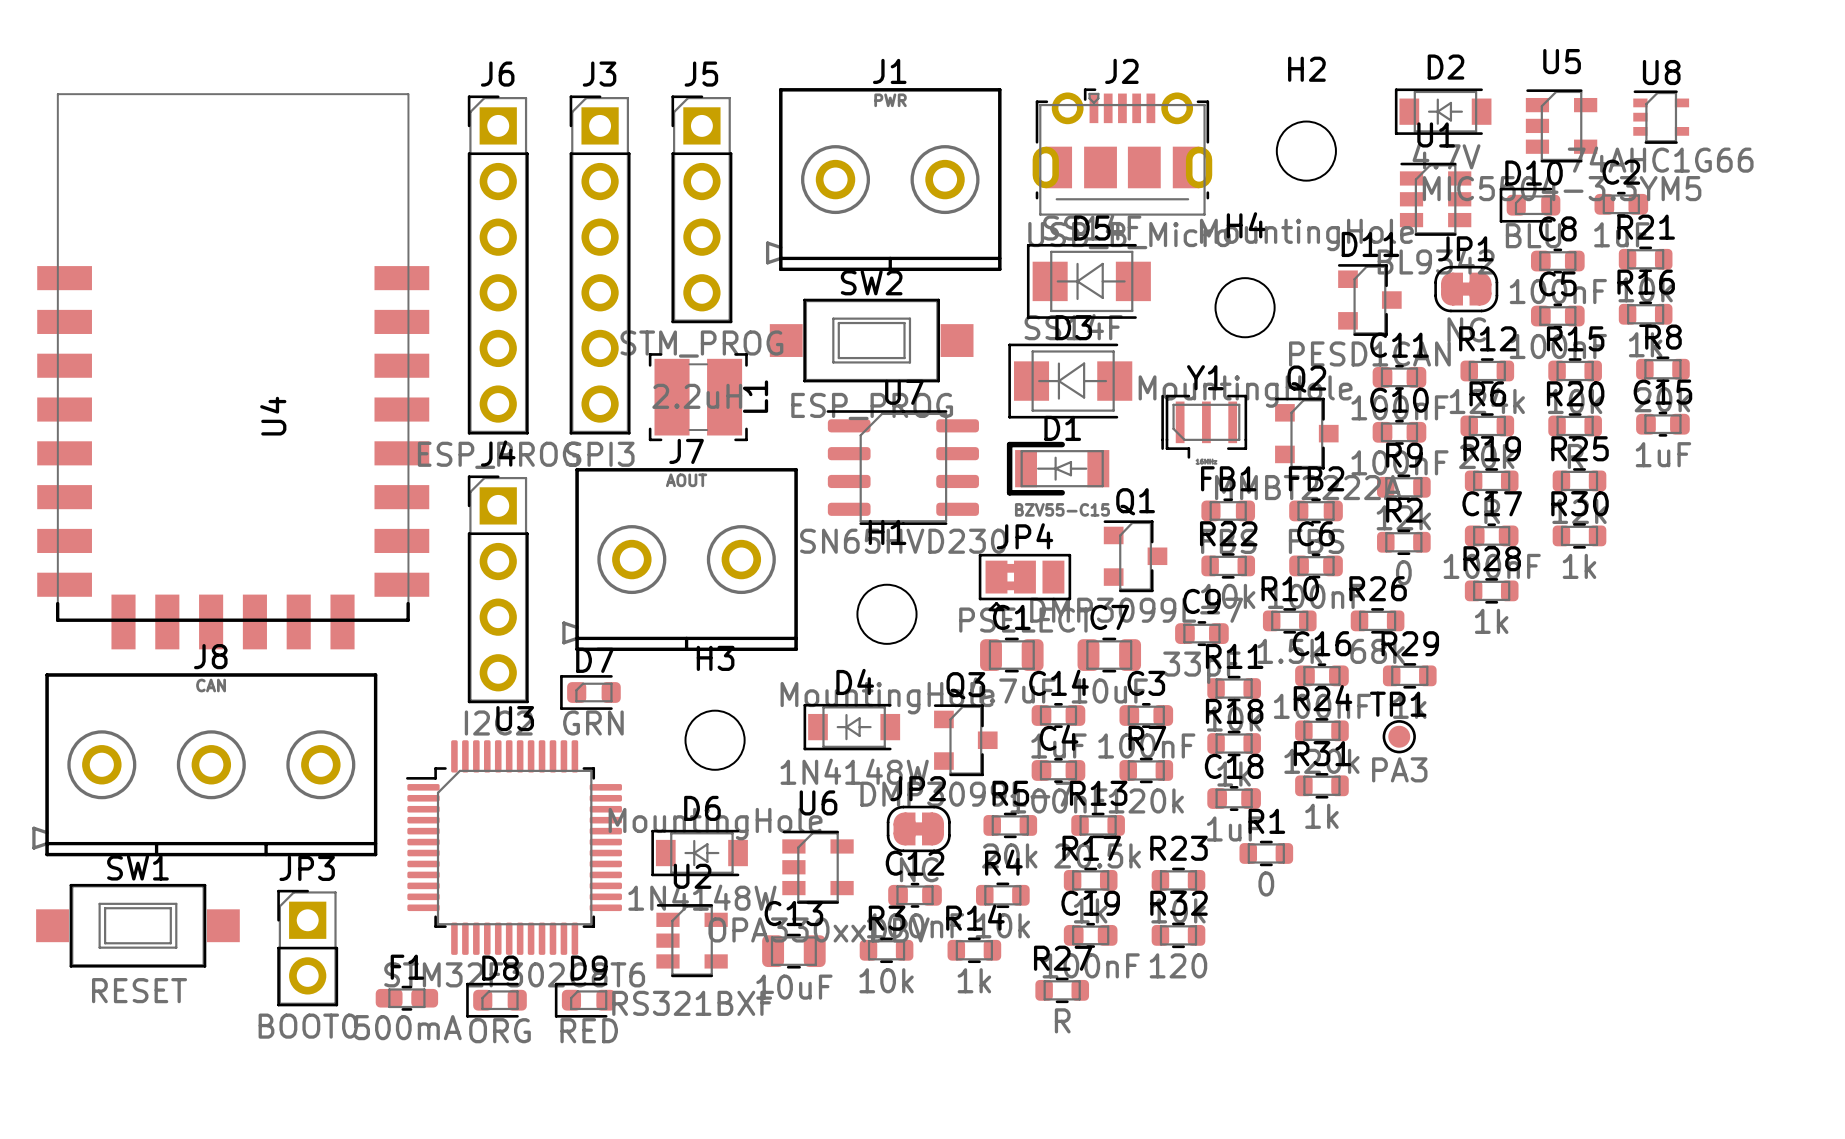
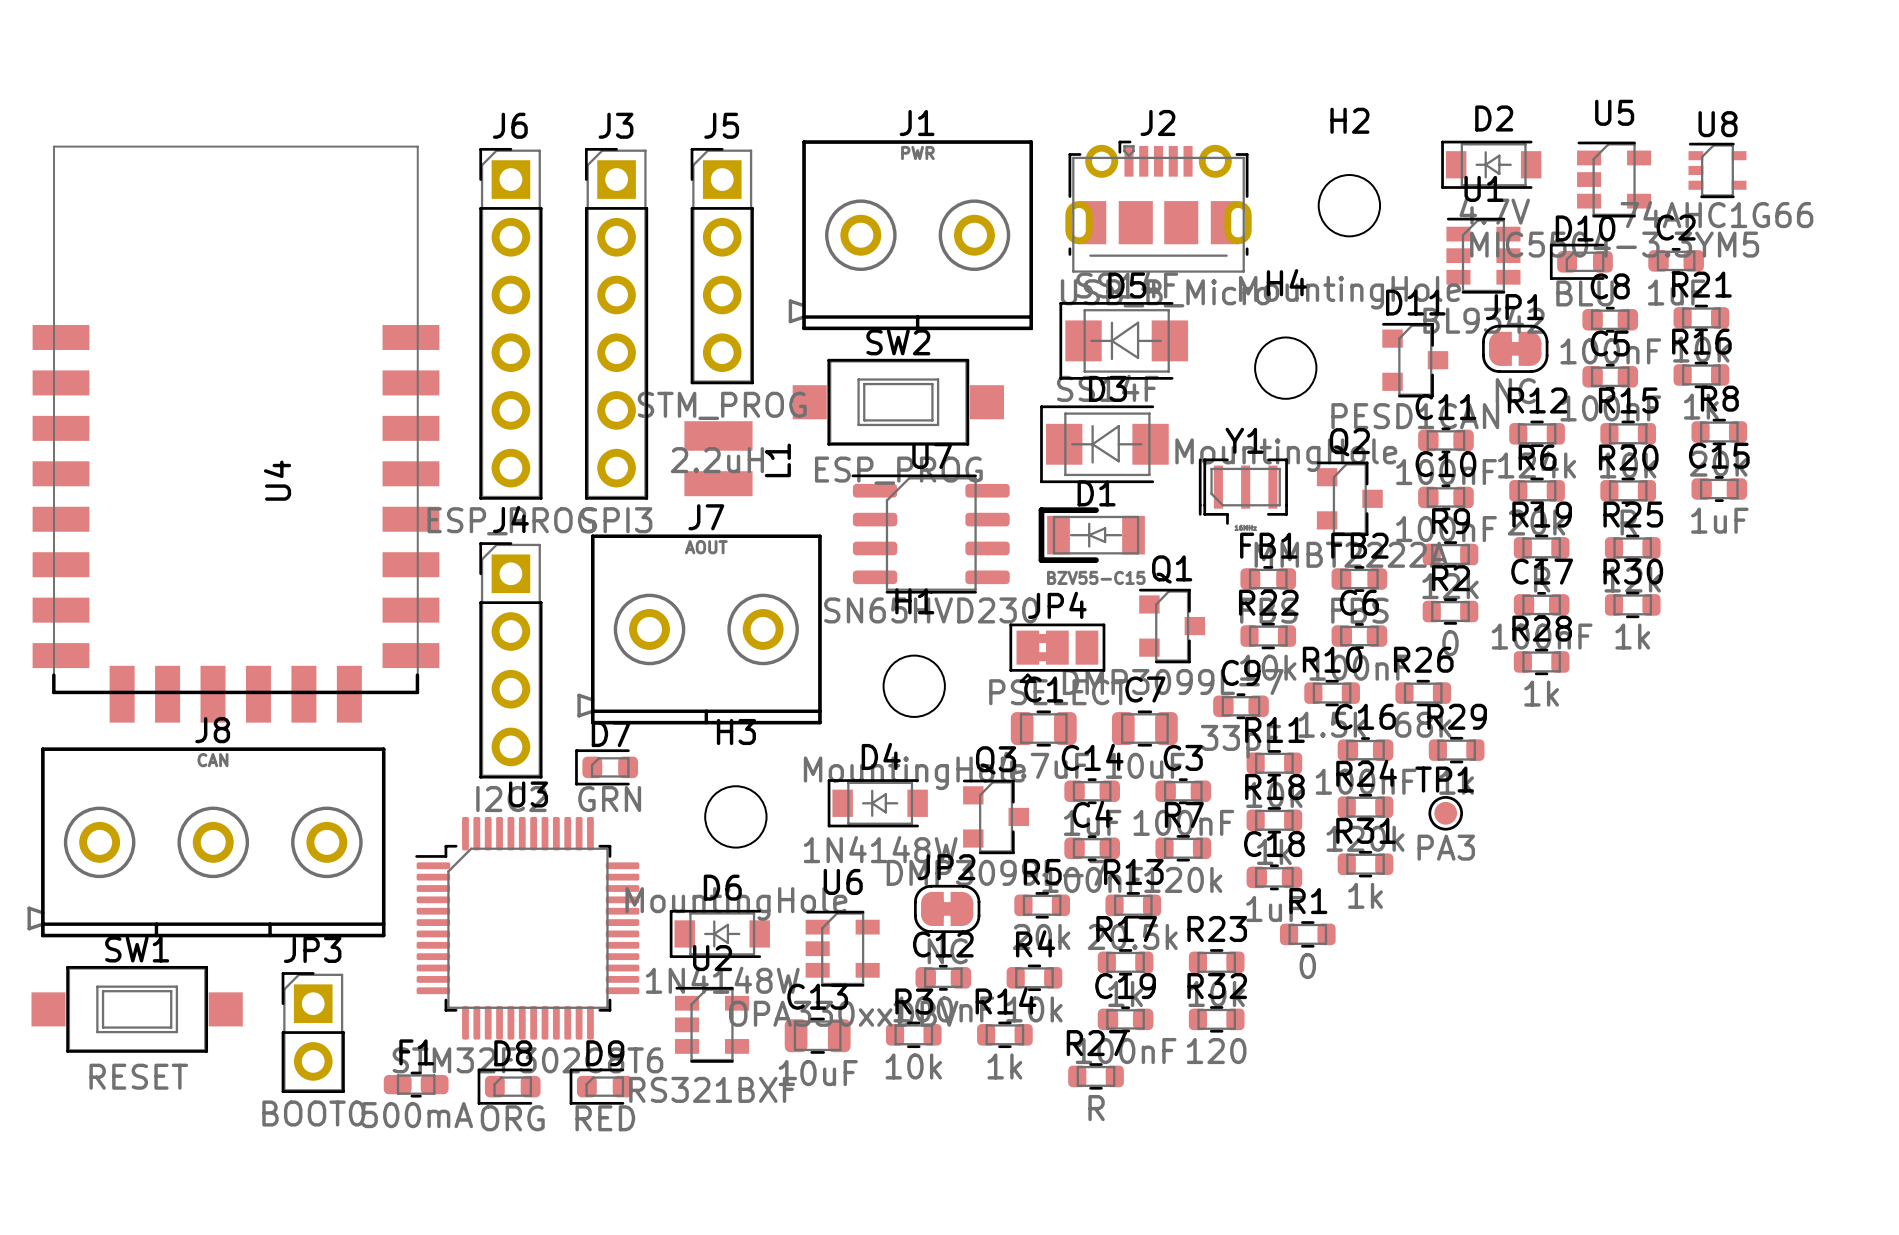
L1 footprint: [648, 353, 748, 442] -> [684, 421, 753, 497]

